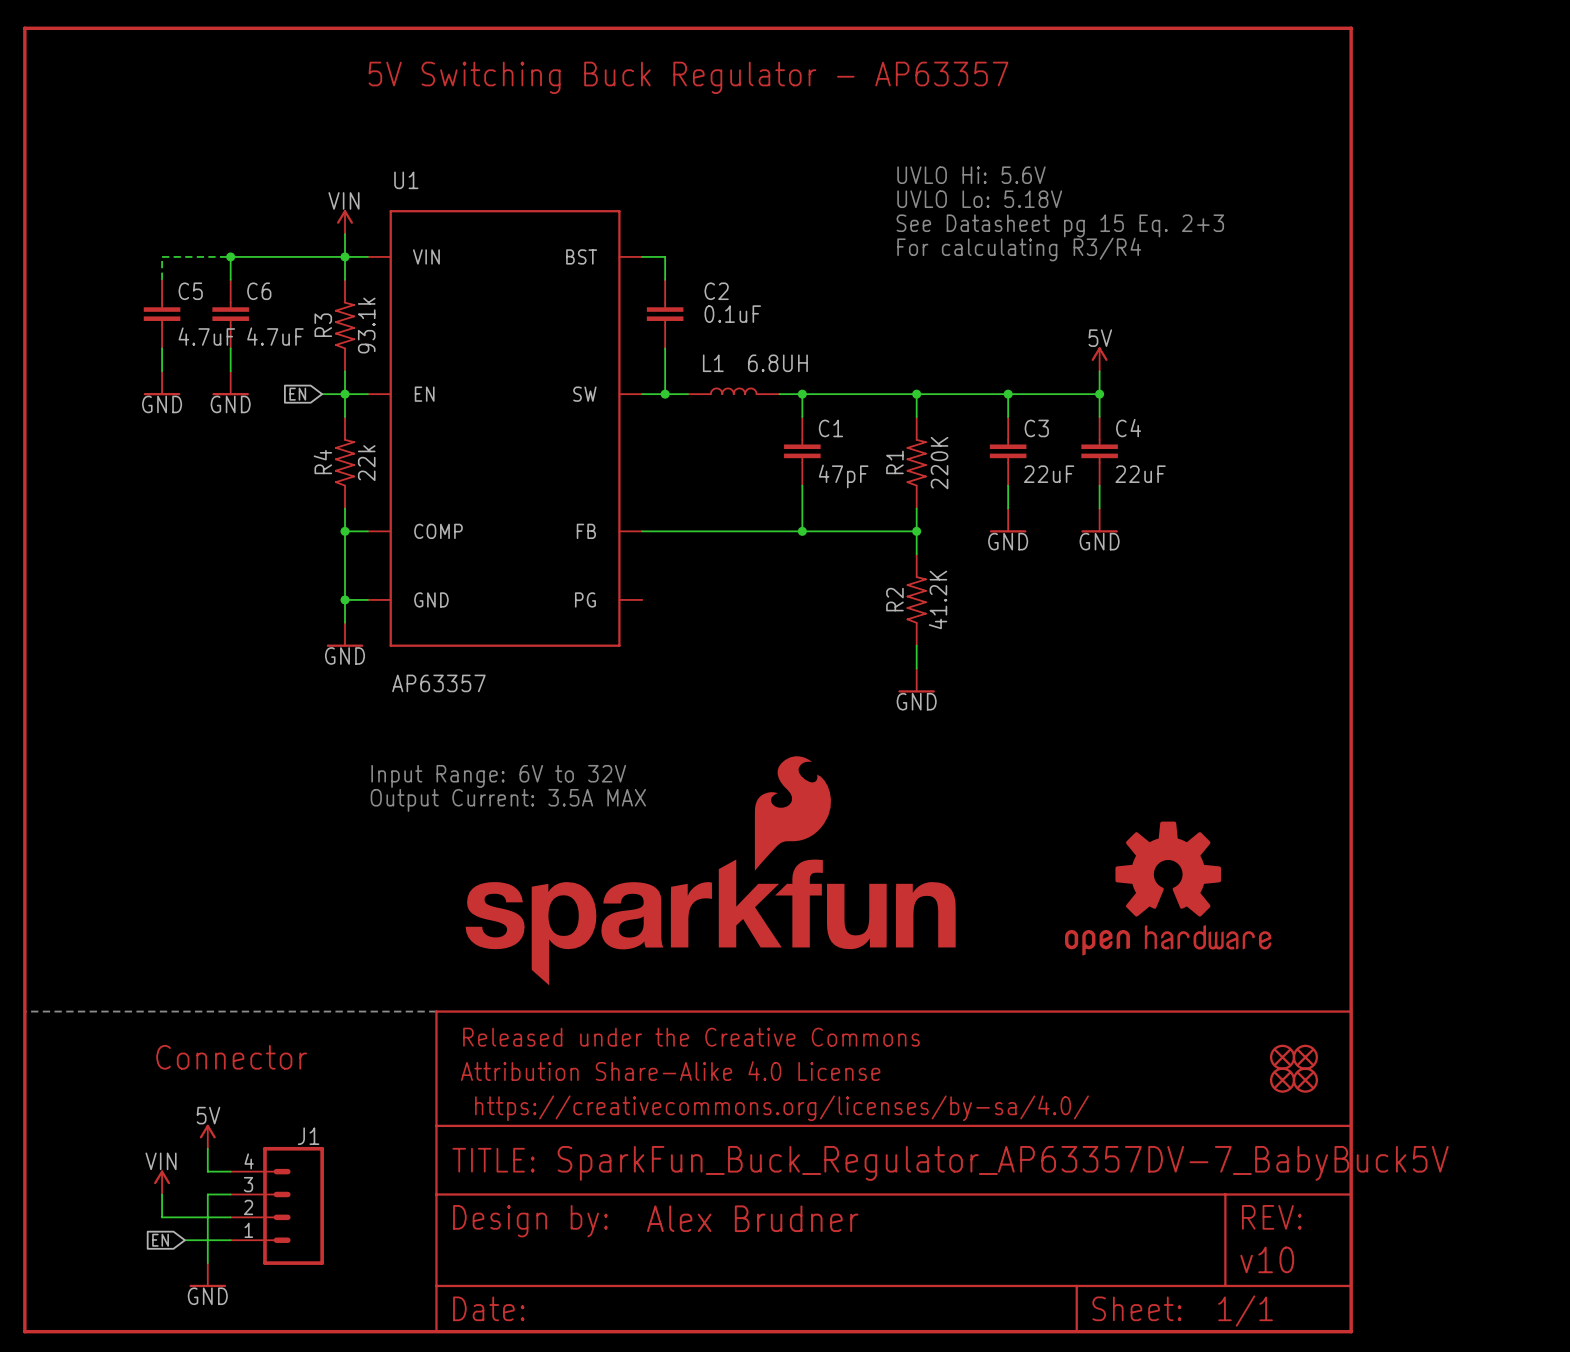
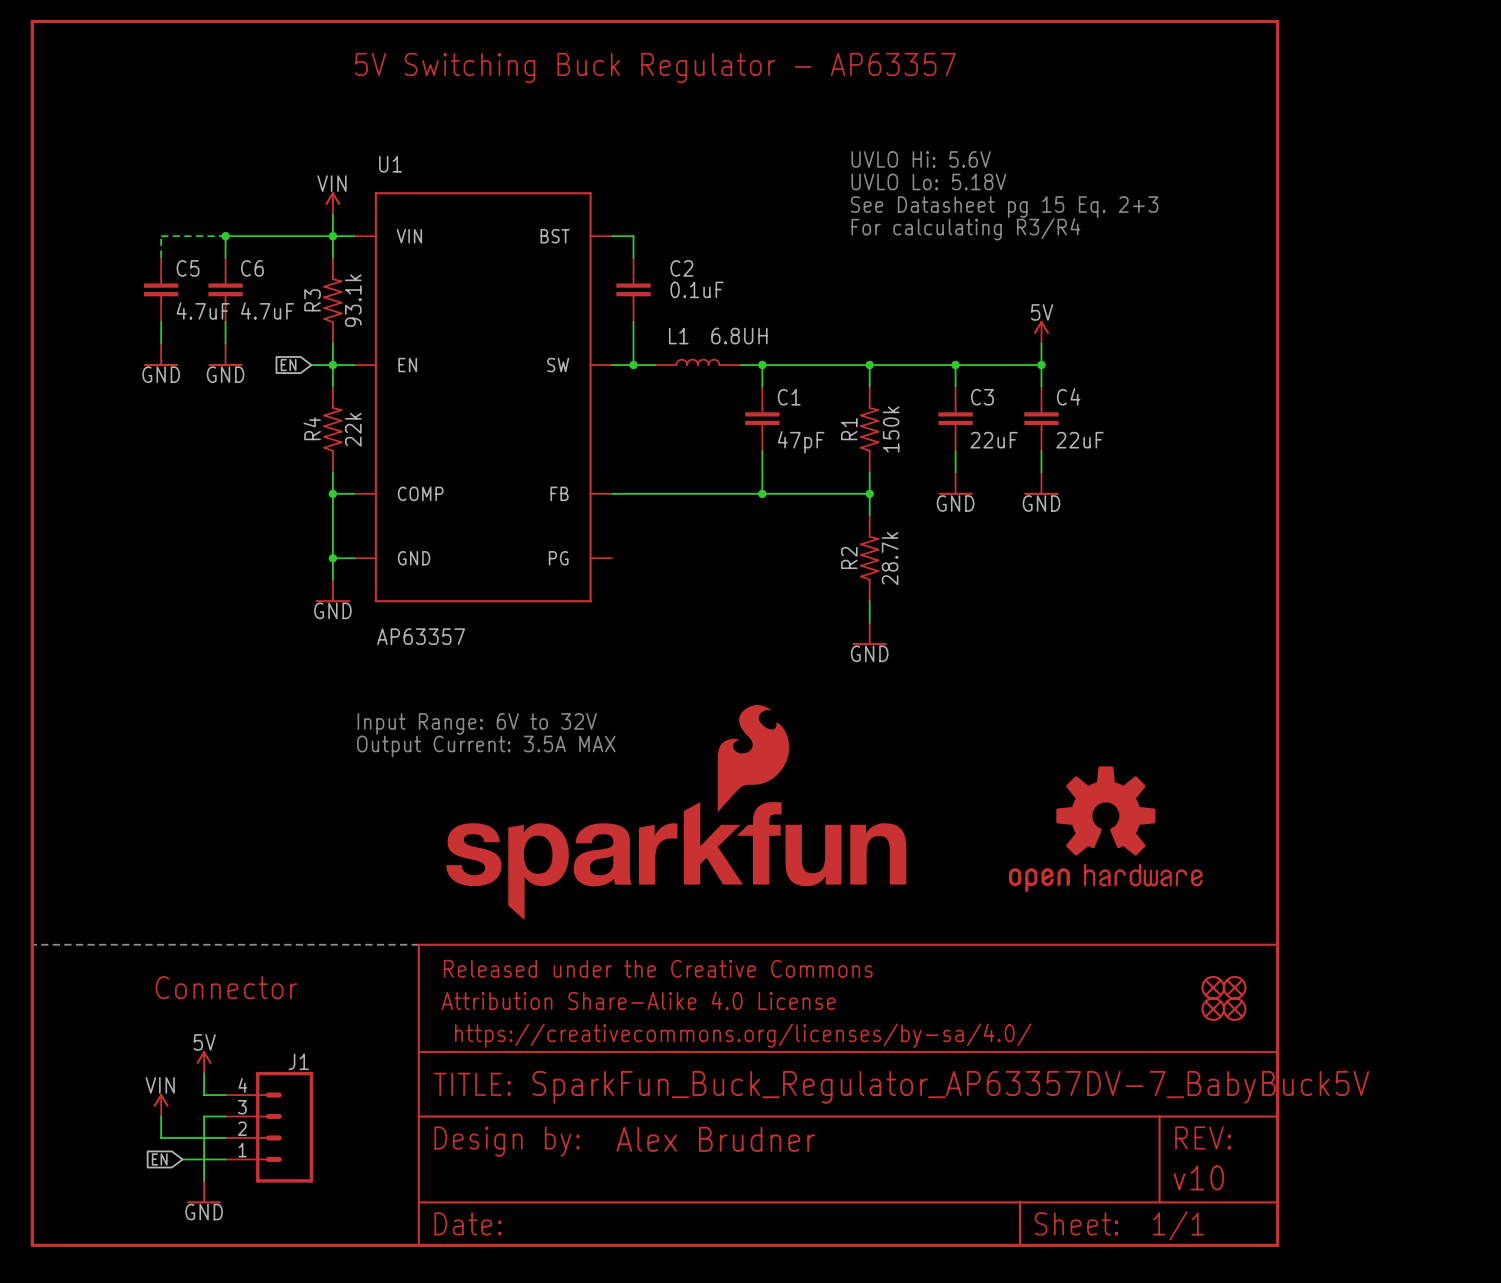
R1 text: 220K (939, 463) -> 150k (891, 429)
R2 value: 41.2K (938, 599) -> 28.7k (890, 558)

